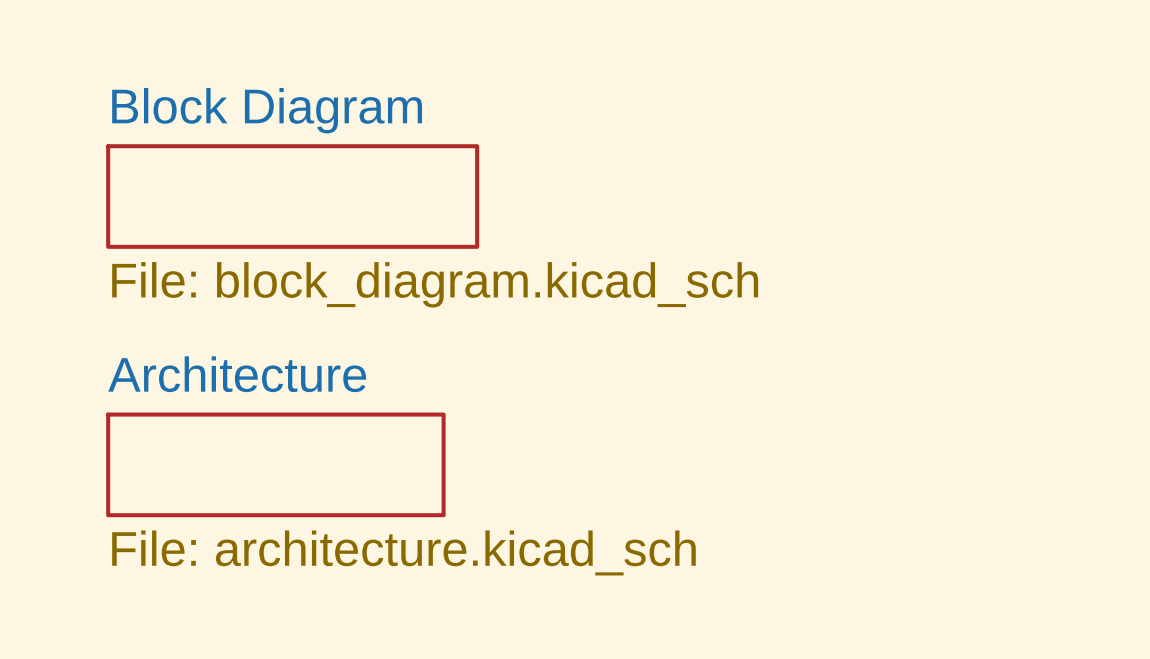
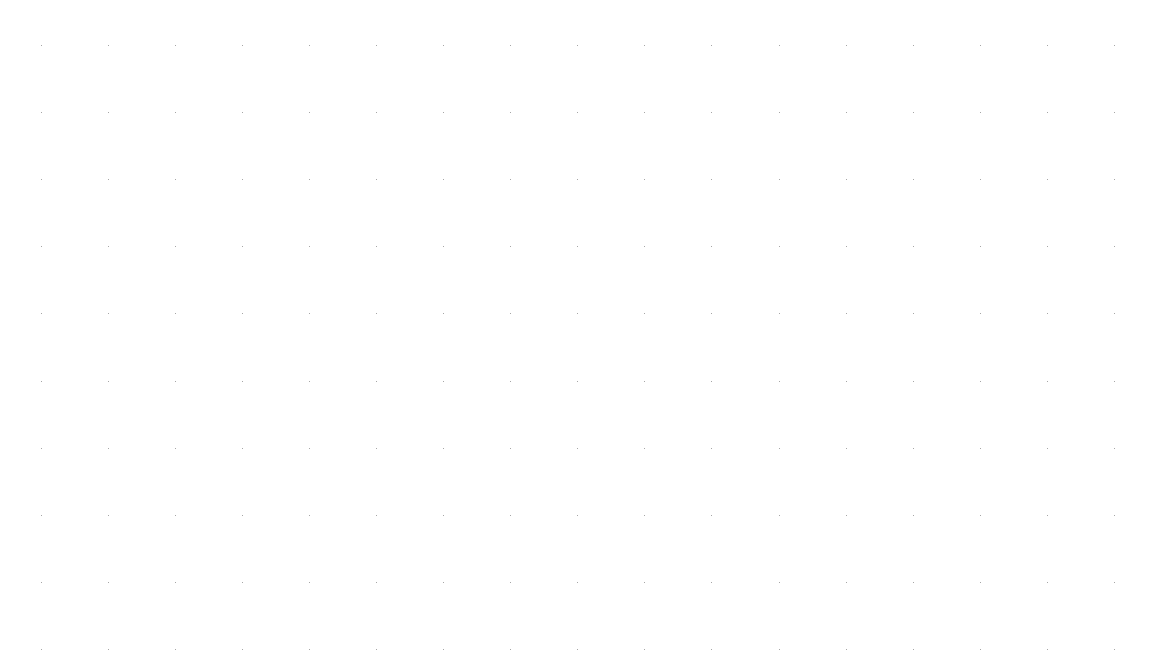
sheet Block Diagram: File: block_diagram.kicad_sch (292, 196) -> none
sheet Architecture: File: architecture.kicad_sch (275, 464) -> none

